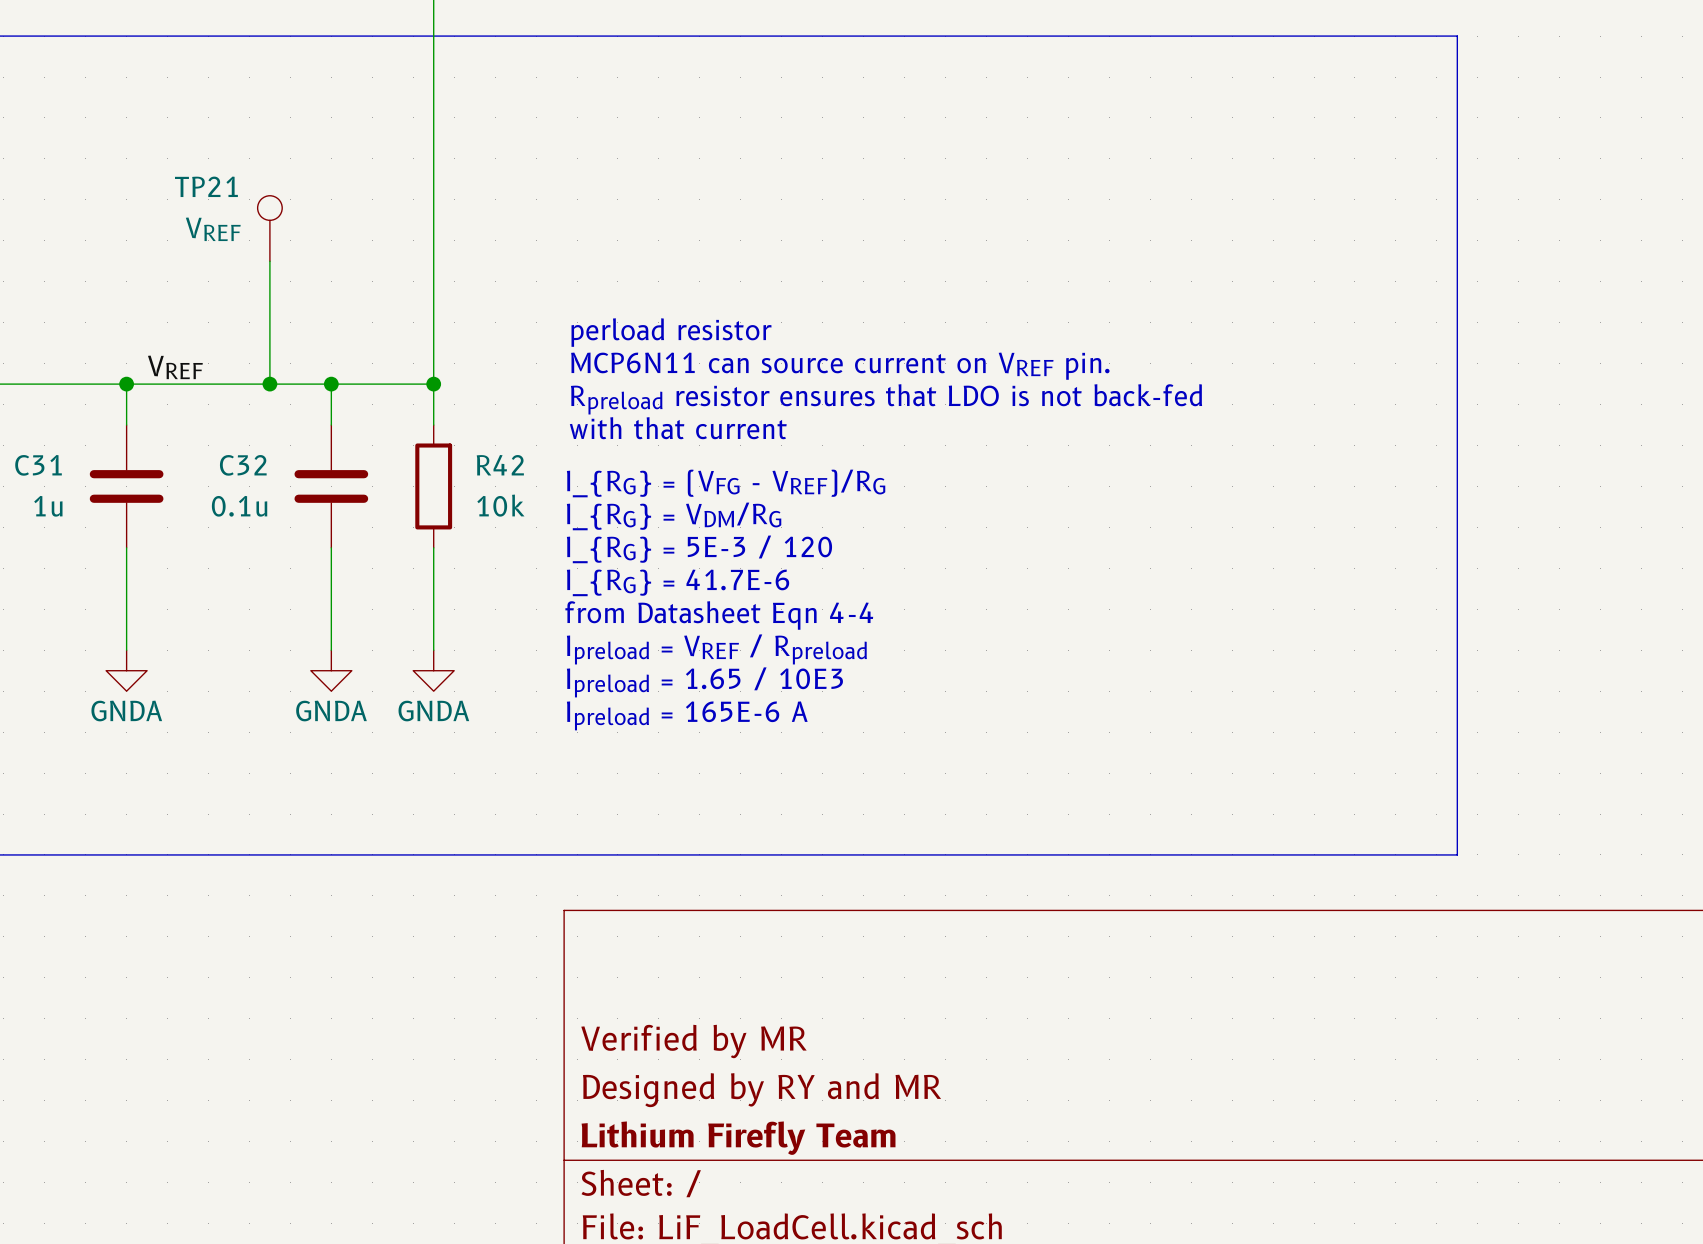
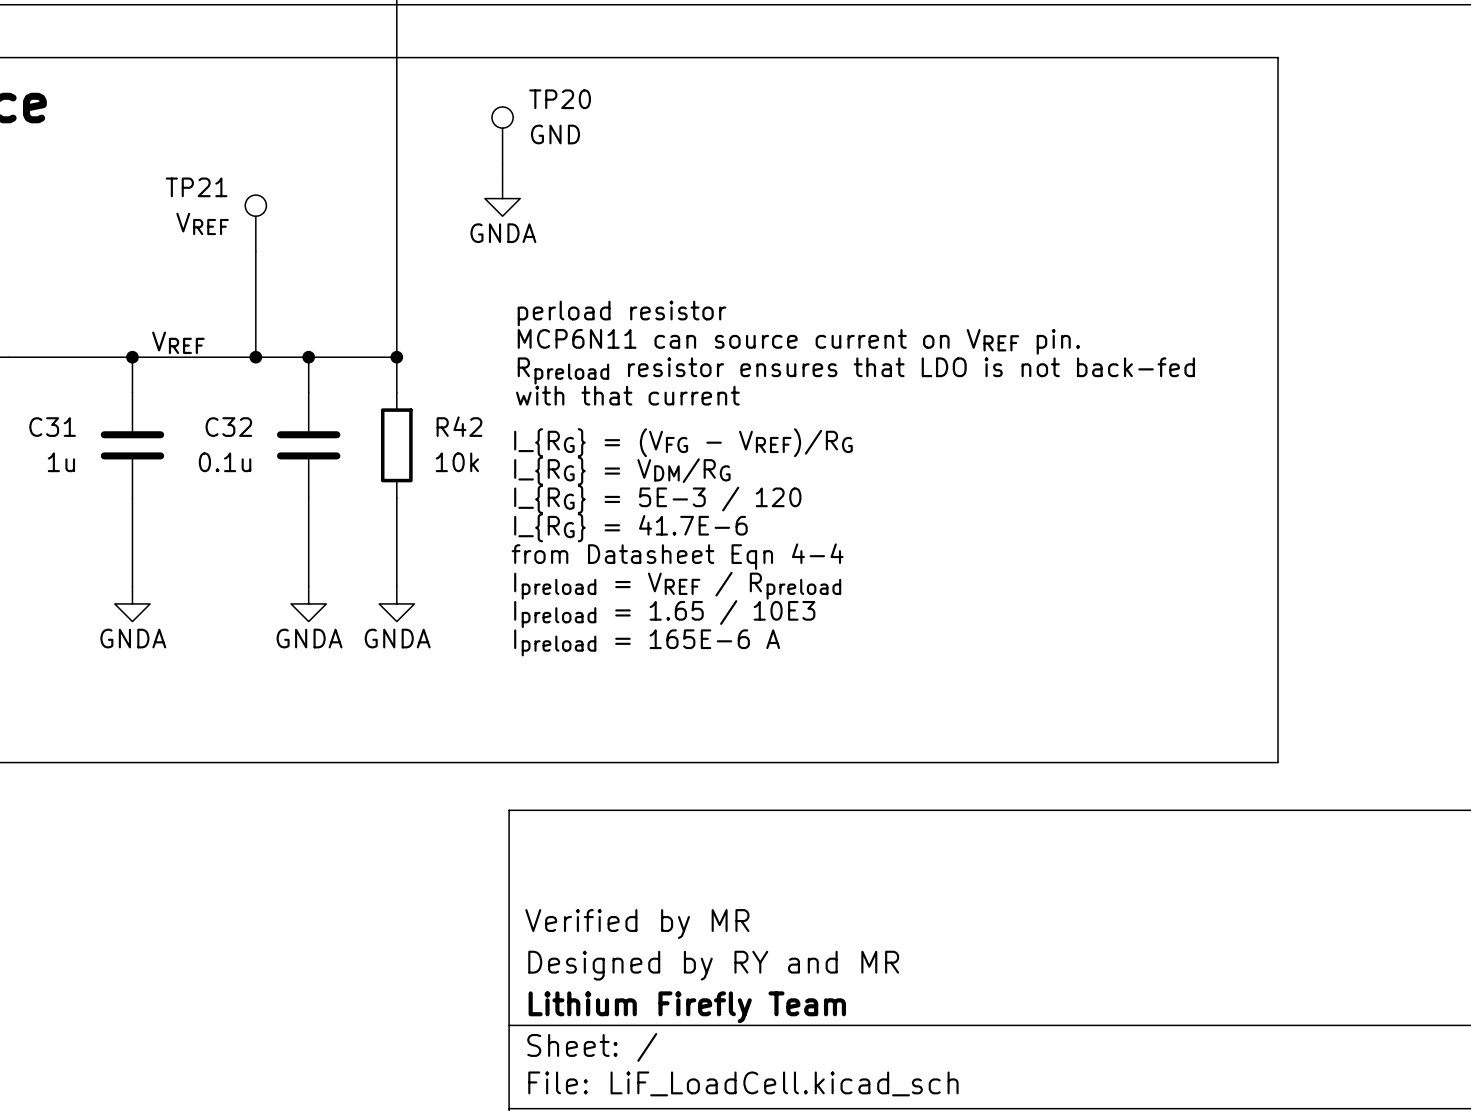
TP20: none -> GND (502, 135)
wire: none -> (502, 163) (502, 180)
power symbol: none -> GNDA (502, 198)

